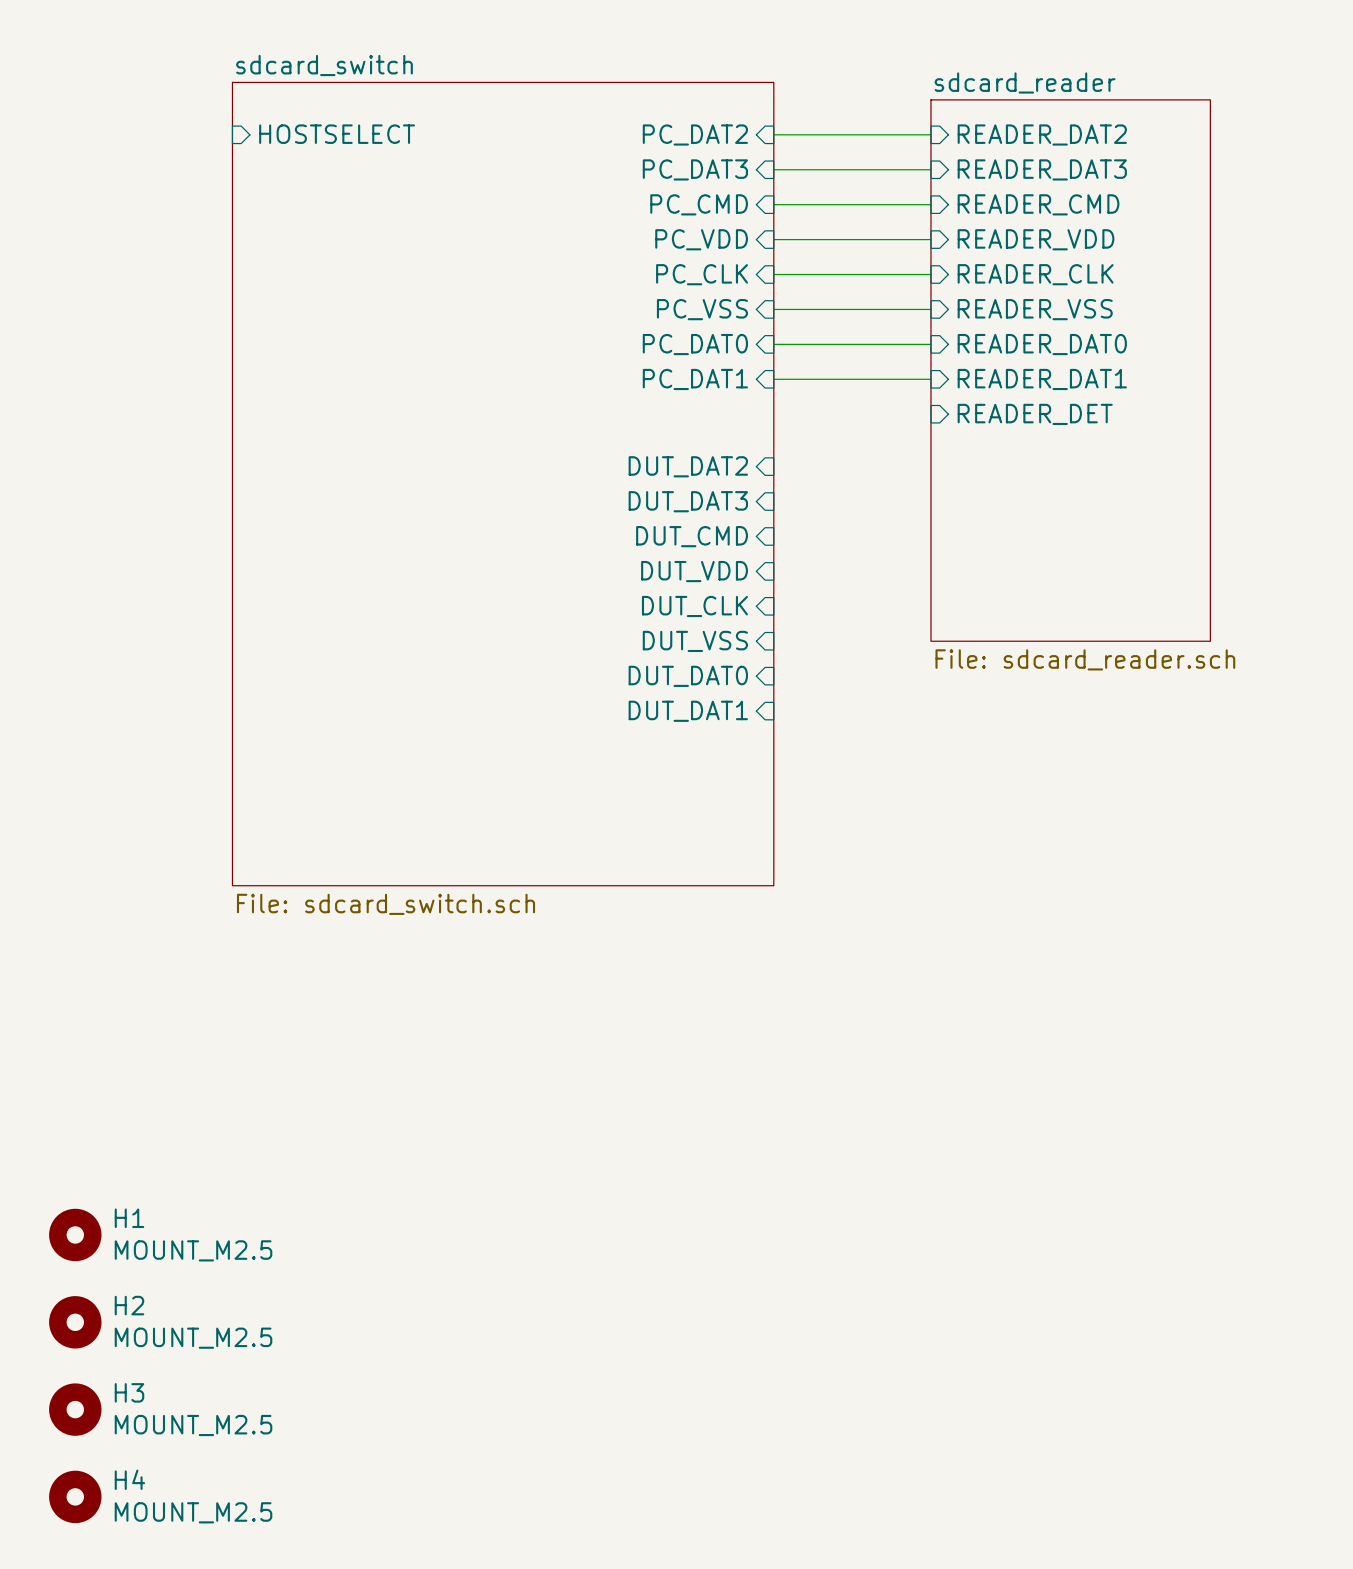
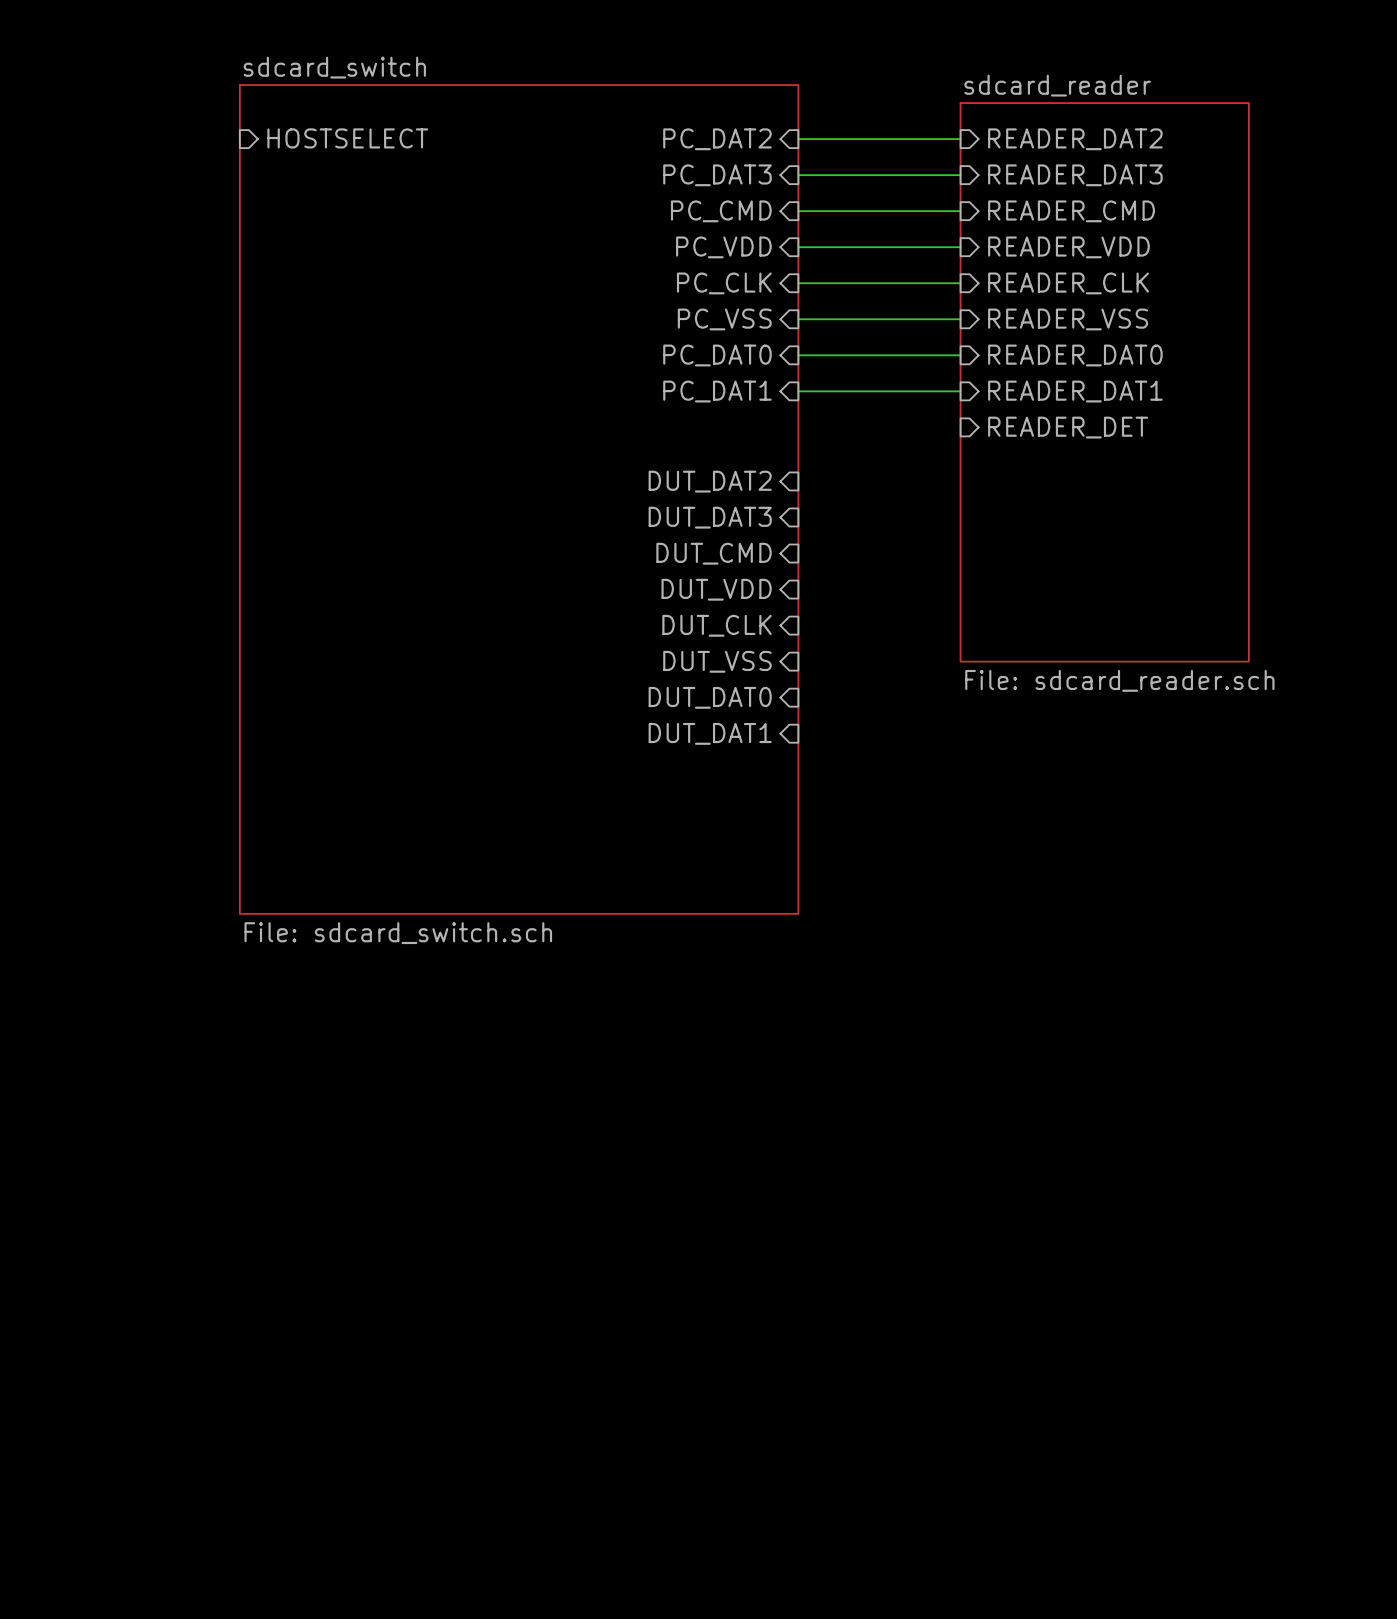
H1: MOUNT_M2.5 (75, 1234) -> none
H2: MOUNT_M2.5 (75, 1322) -> none
H3: MOUNT_M2.5 (75, 1409) -> none
H4: MOUNT_M2.5 (75, 1496) -> none

